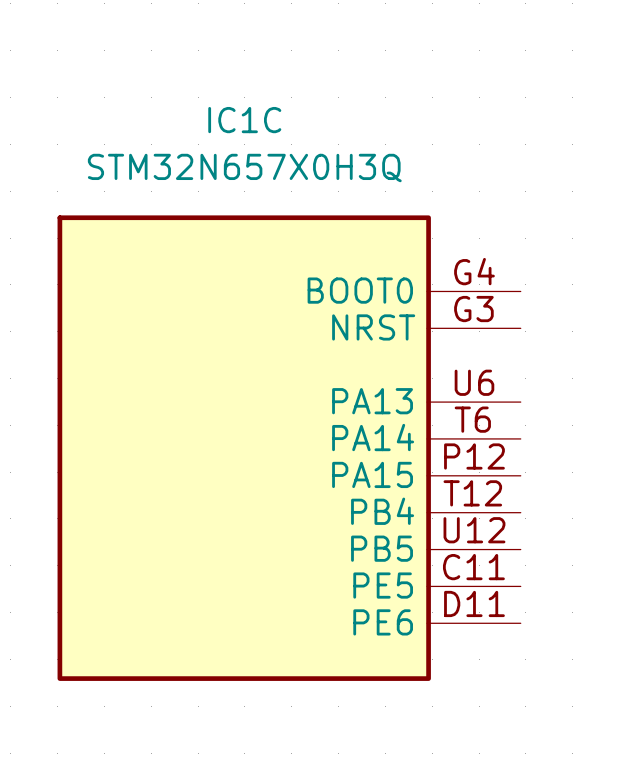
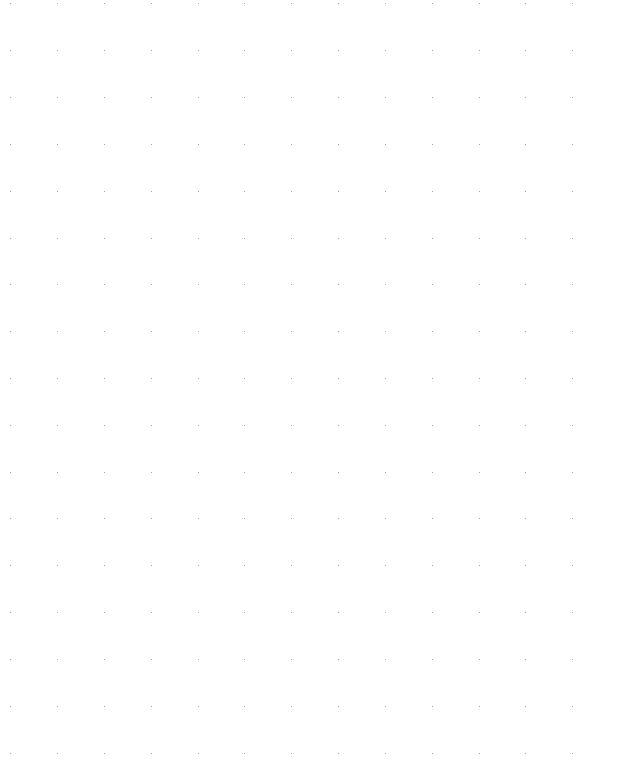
IC1C: STM32N657X0H3Q (289, 448) -> none

